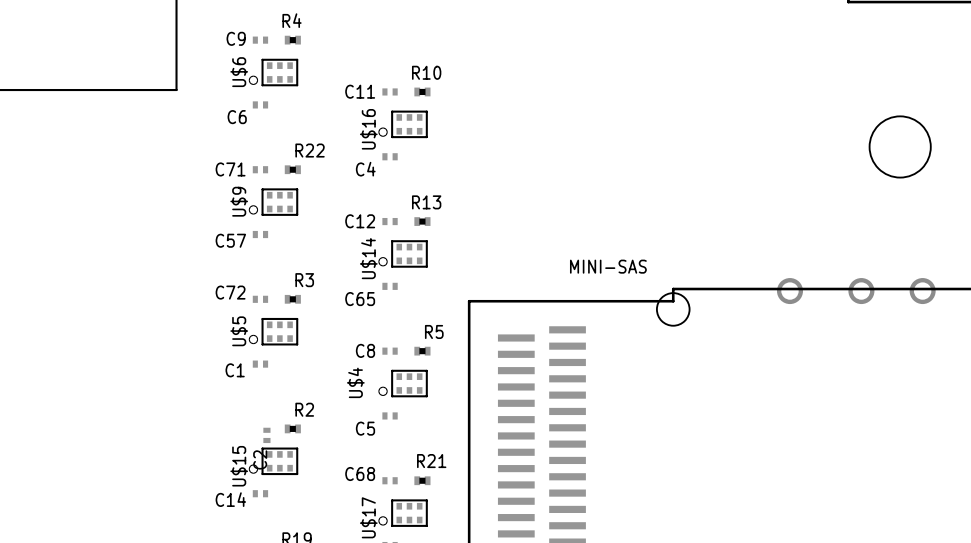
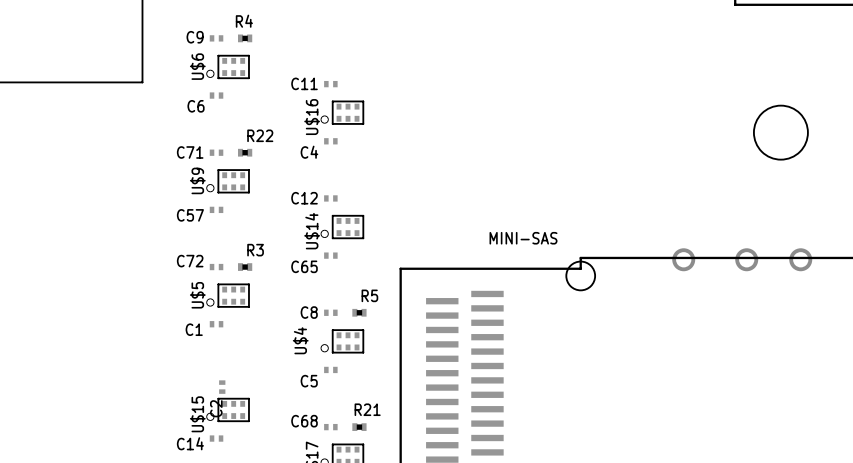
R10: (422, 91) -> none
R13: (422, 221) -> none
R2: (292, 428) -> none

